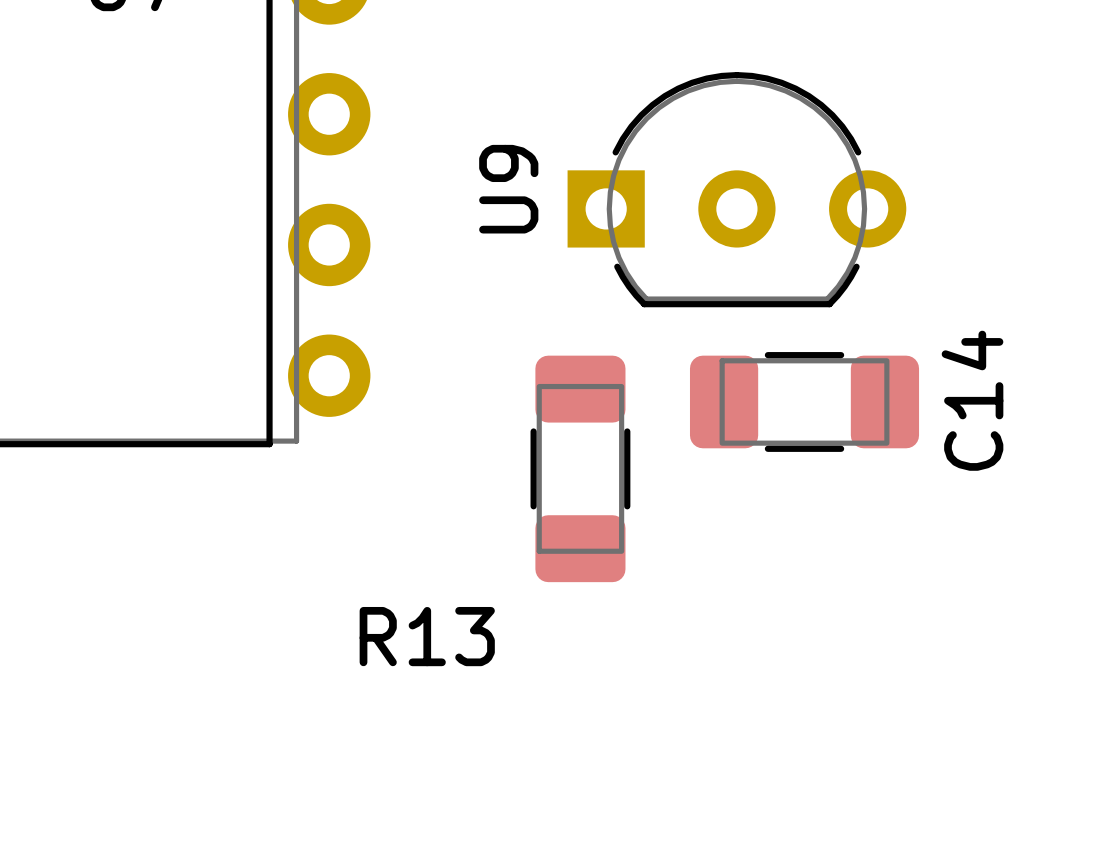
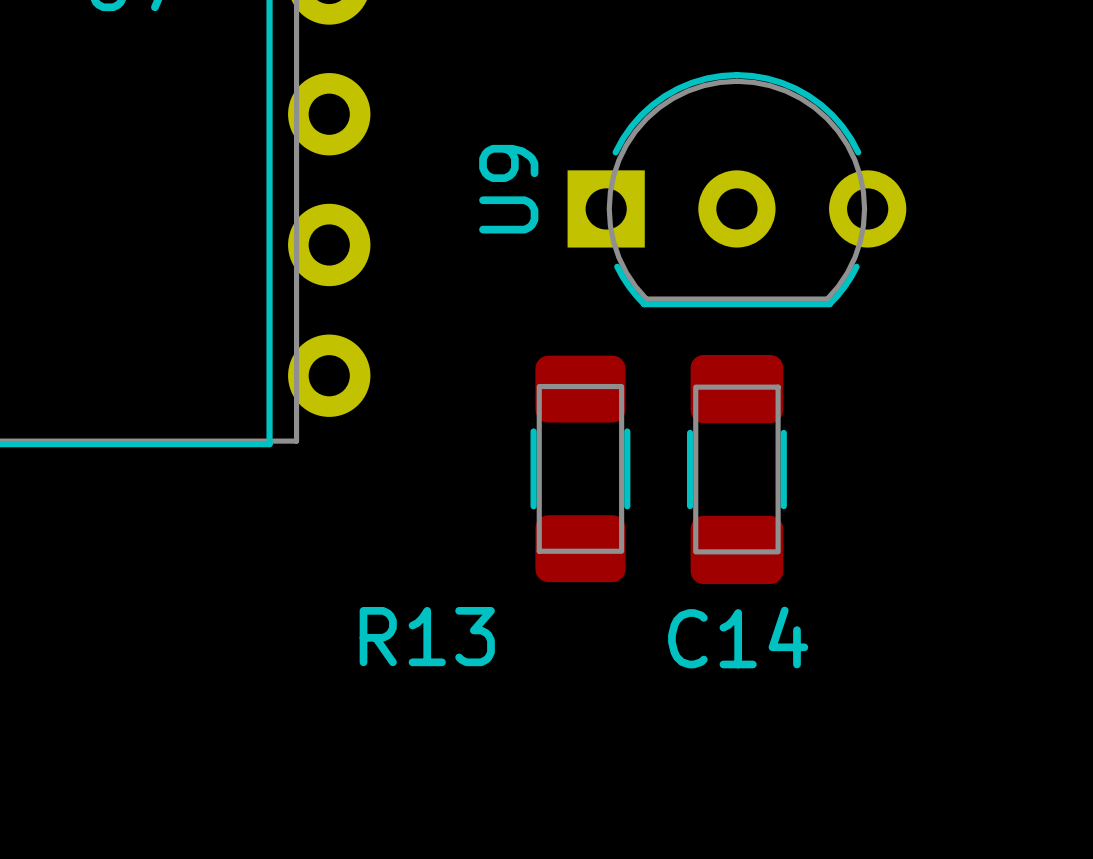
C14 rotation: 0° (804, 401) -> 90° clockwise (736, 469)

